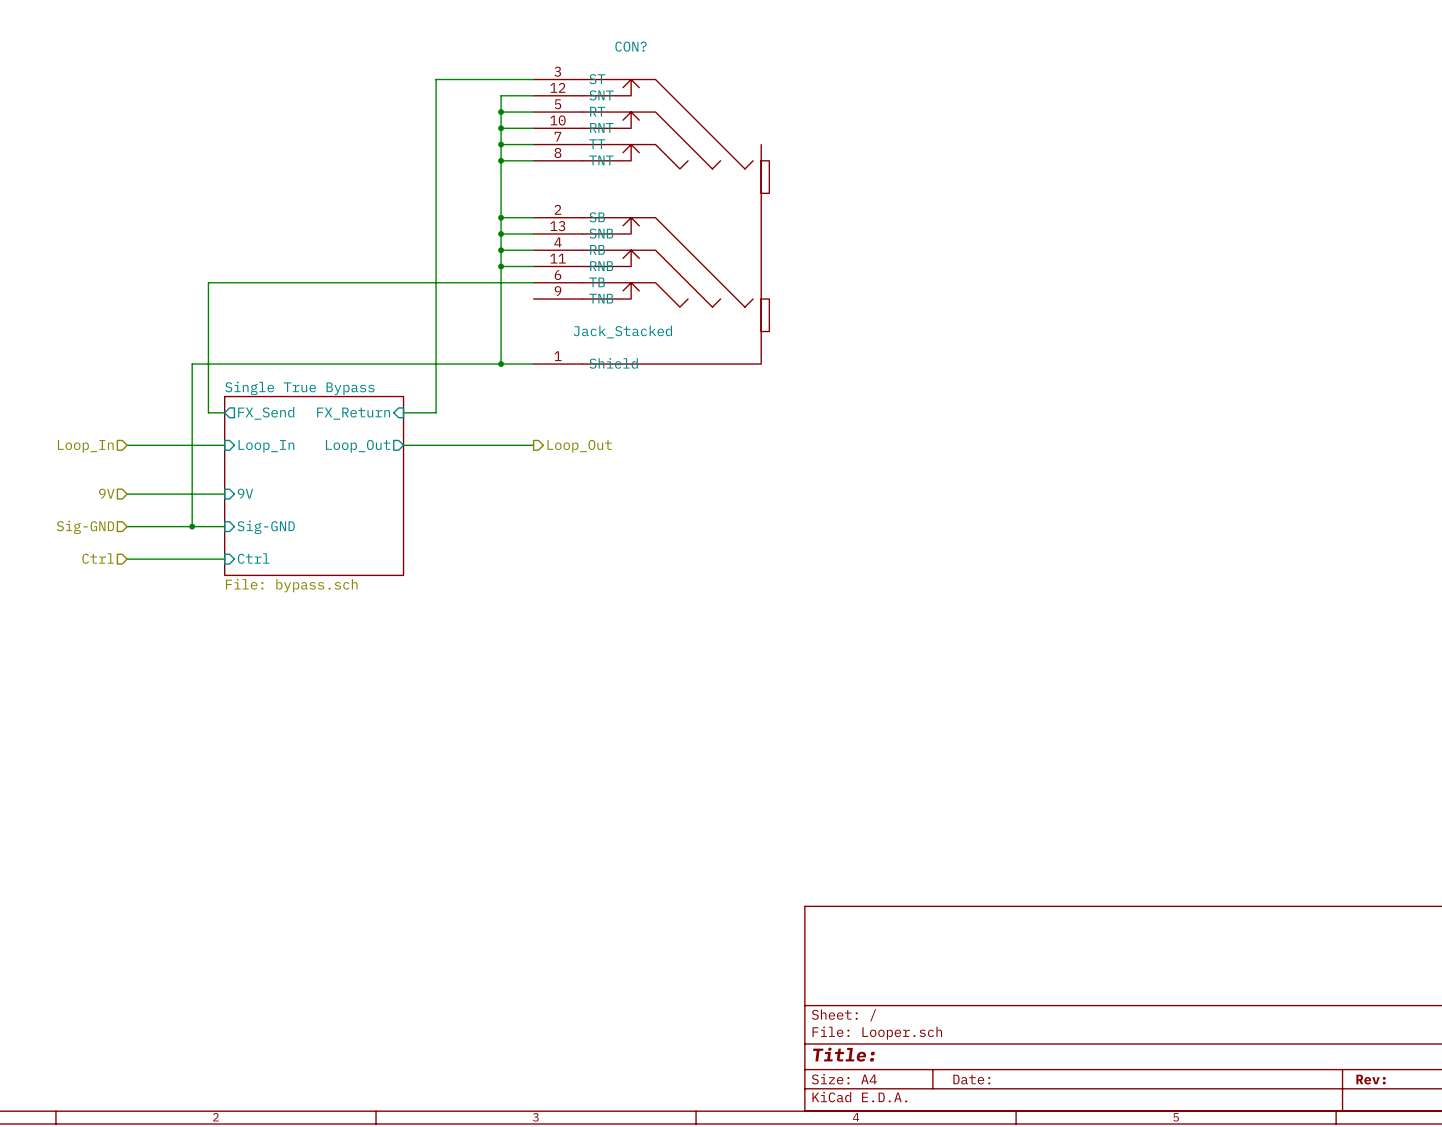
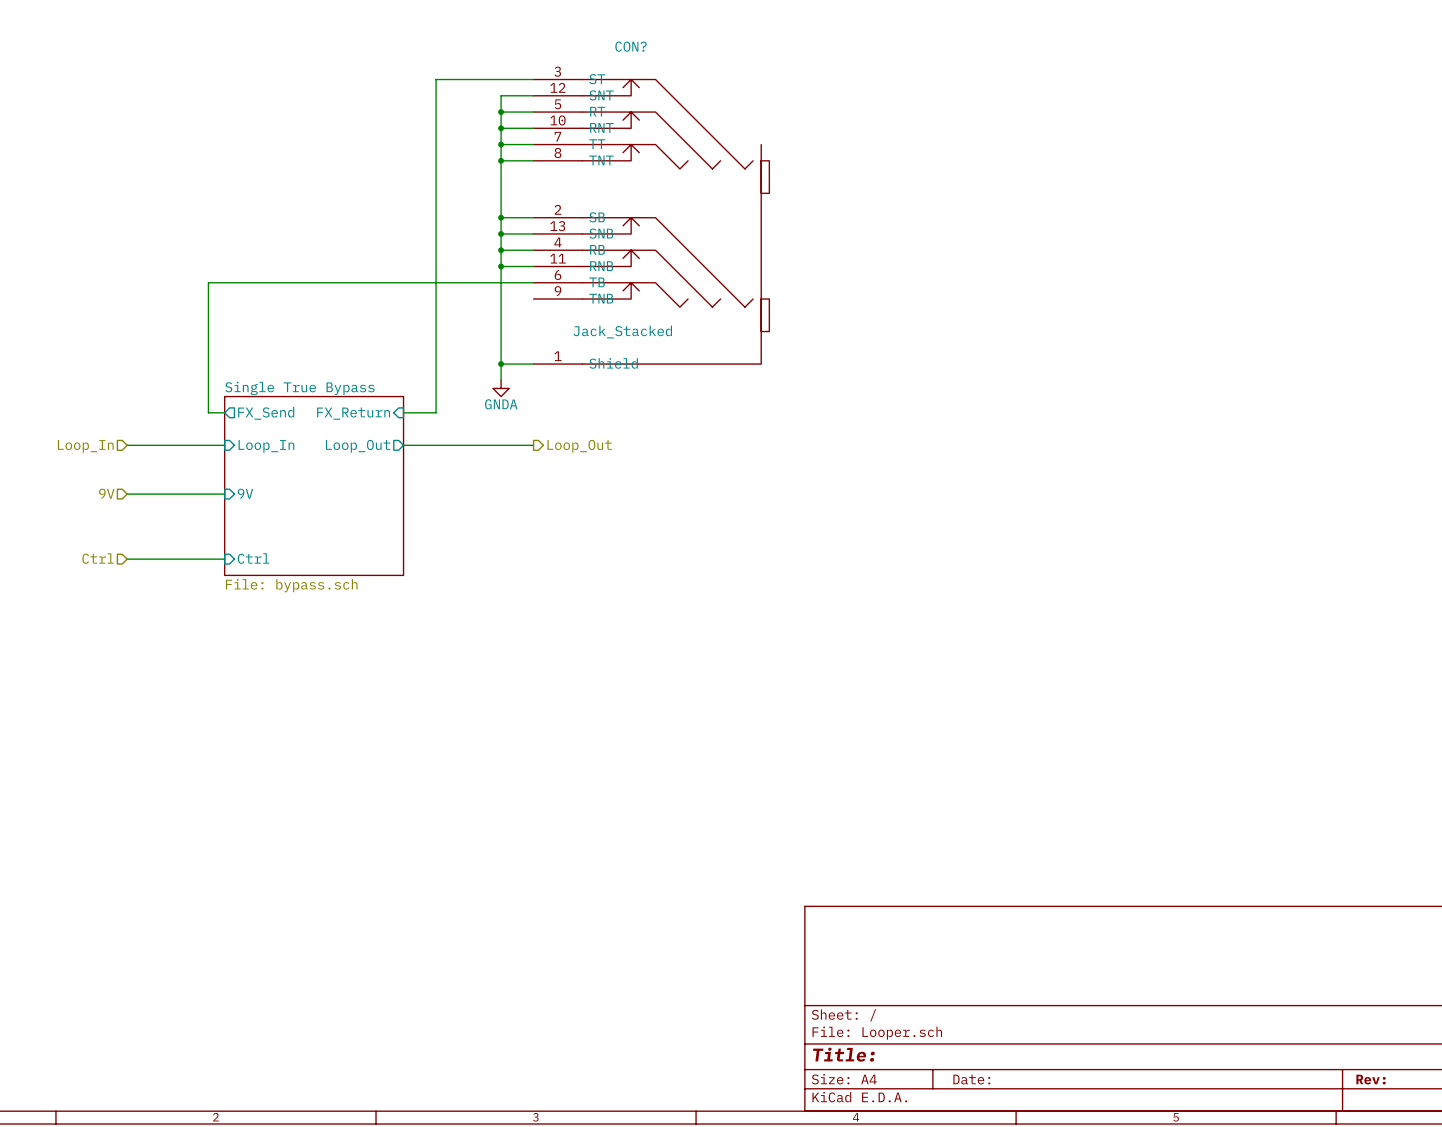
wire: (501, 364) (192, 364) (192, 526) -> (501, 364) (501, 380)
power symbol: none -> GNDA (501, 388)
wire: (127, 526) (224, 526) -> none
junction: (192, 526) -> none
hierarchical label: Sig-GND (85, 527) -> none
sheet pin: Sig-GND (266, 527) -> none

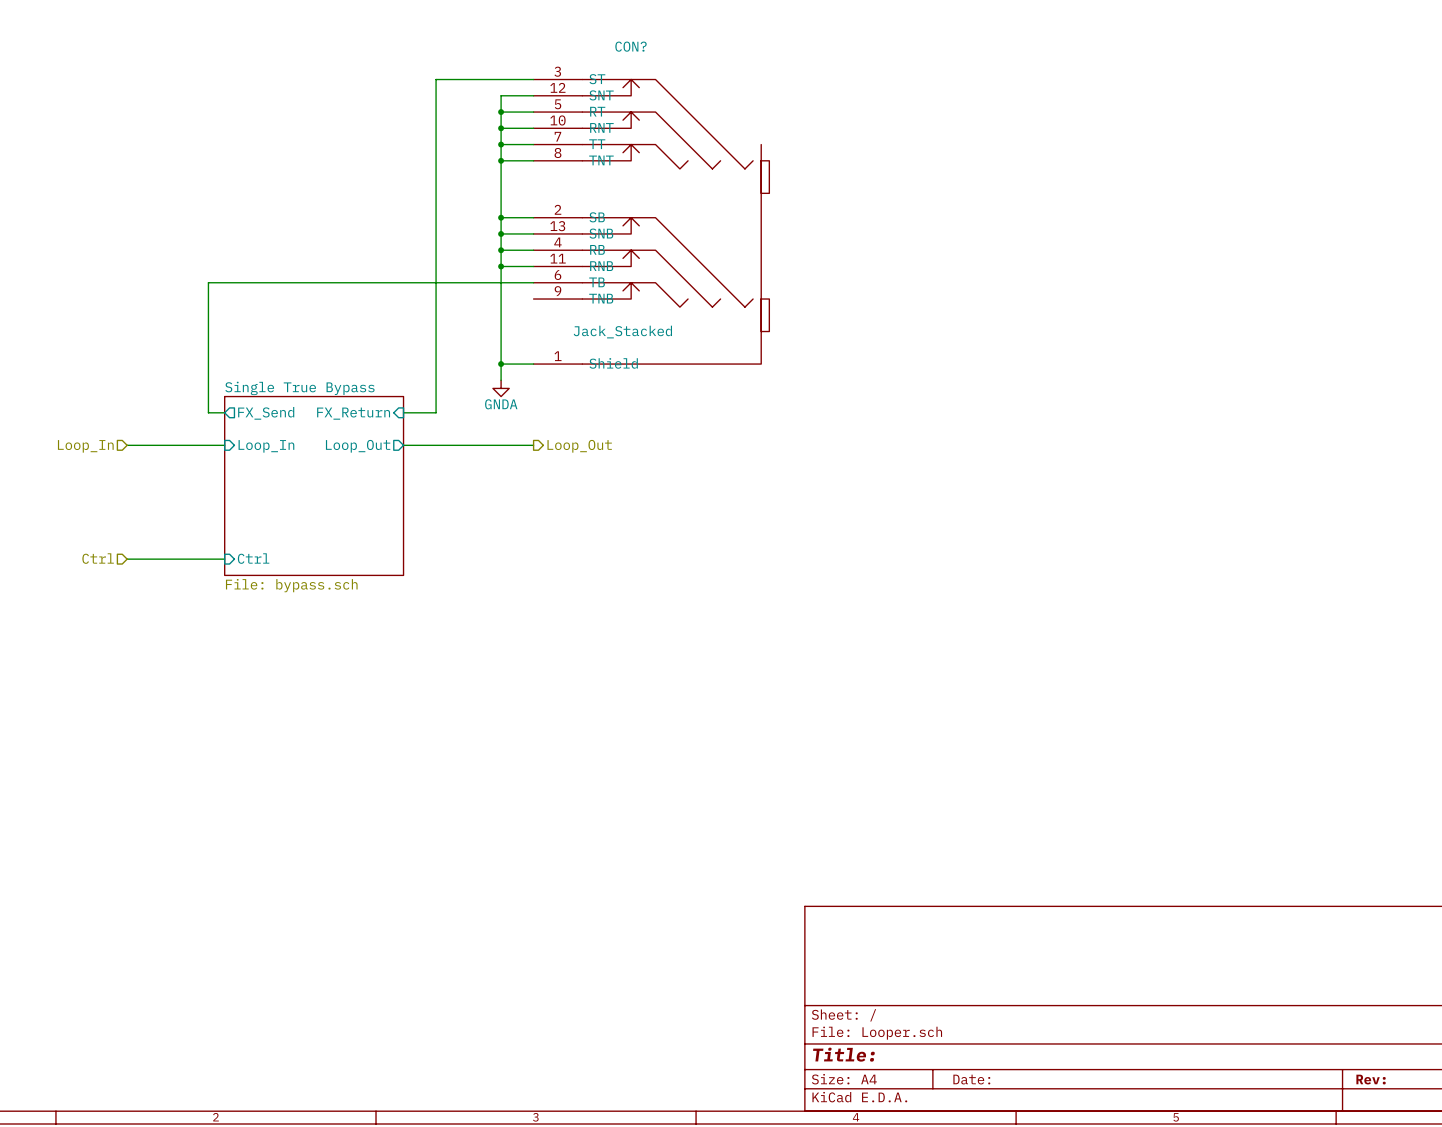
hierarchical label: 9V (106, 493) -> none
sheet pin: 9V (245, 493) -> none
wire: (127, 494) (224, 494) -> none

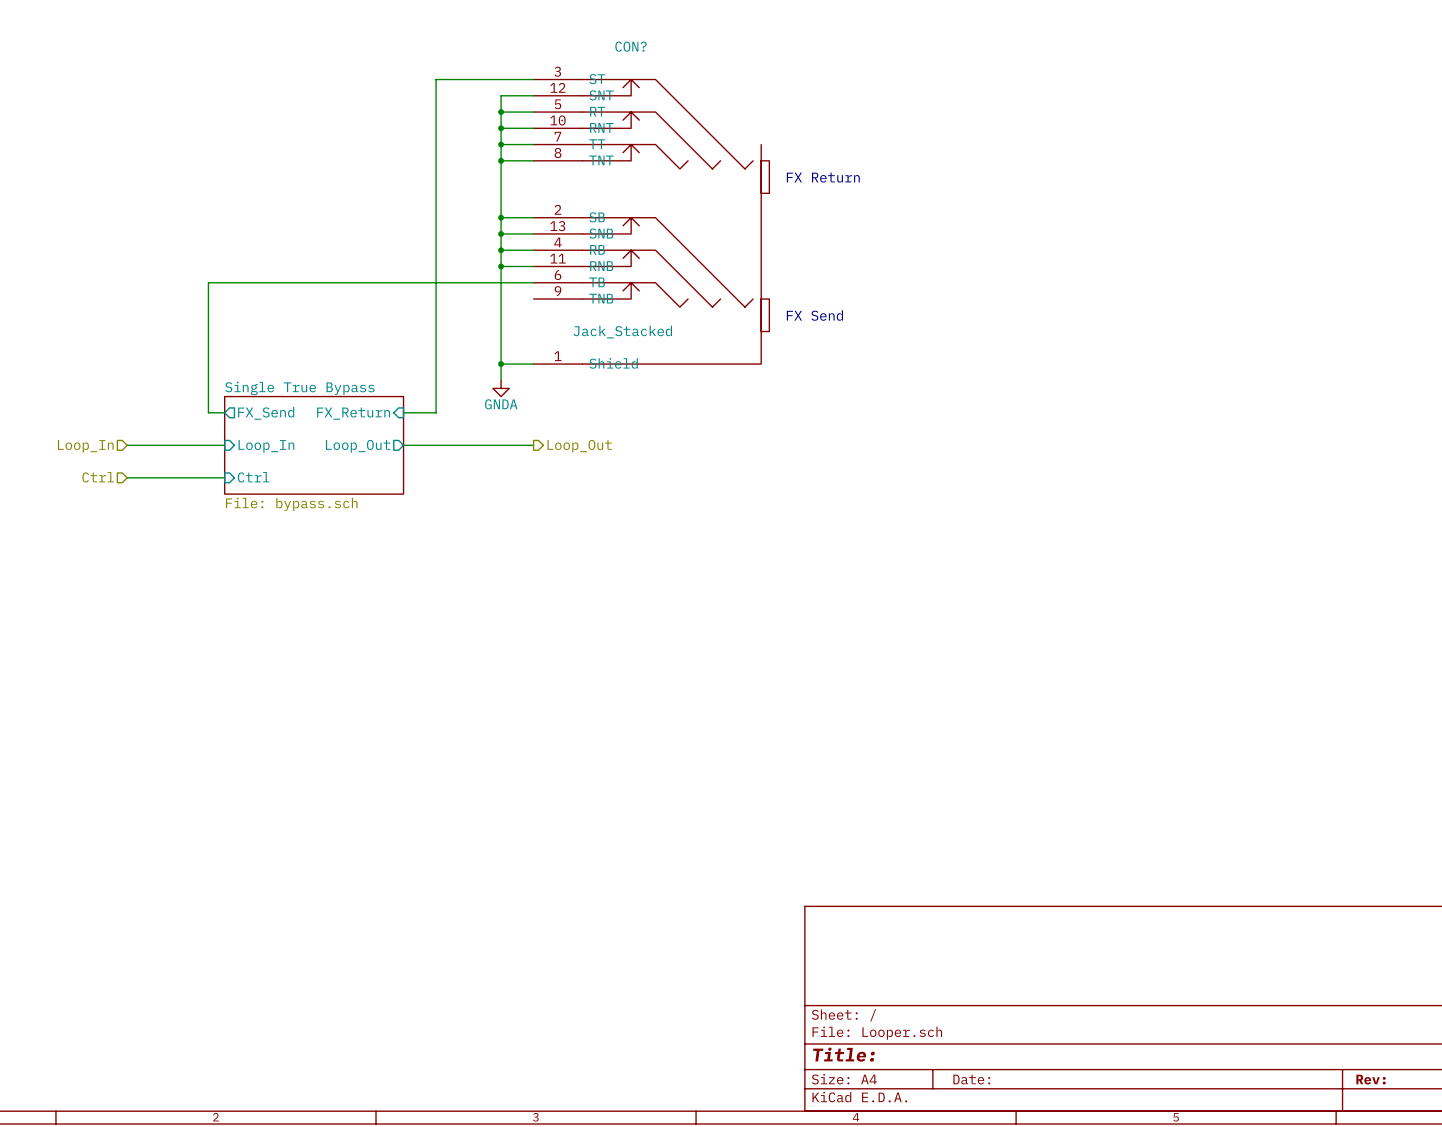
text: none -> FX Return (823, 177)
text: none -> FX Send (814, 315)
sheet Single True Bypass: none -> File: bypass.sch (314, 445)
sheet Single True Bypass: File: bypass.sch (314, 485) -> none
hierarchical label position: Ctrl (98, 558) -> Ctrl (98, 477)
sheet pin position: Ctrl (253, 558) -> Ctrl (253, 477)
wire: (127, 559) (224, 559) -> (127, 477) (224, 477)

